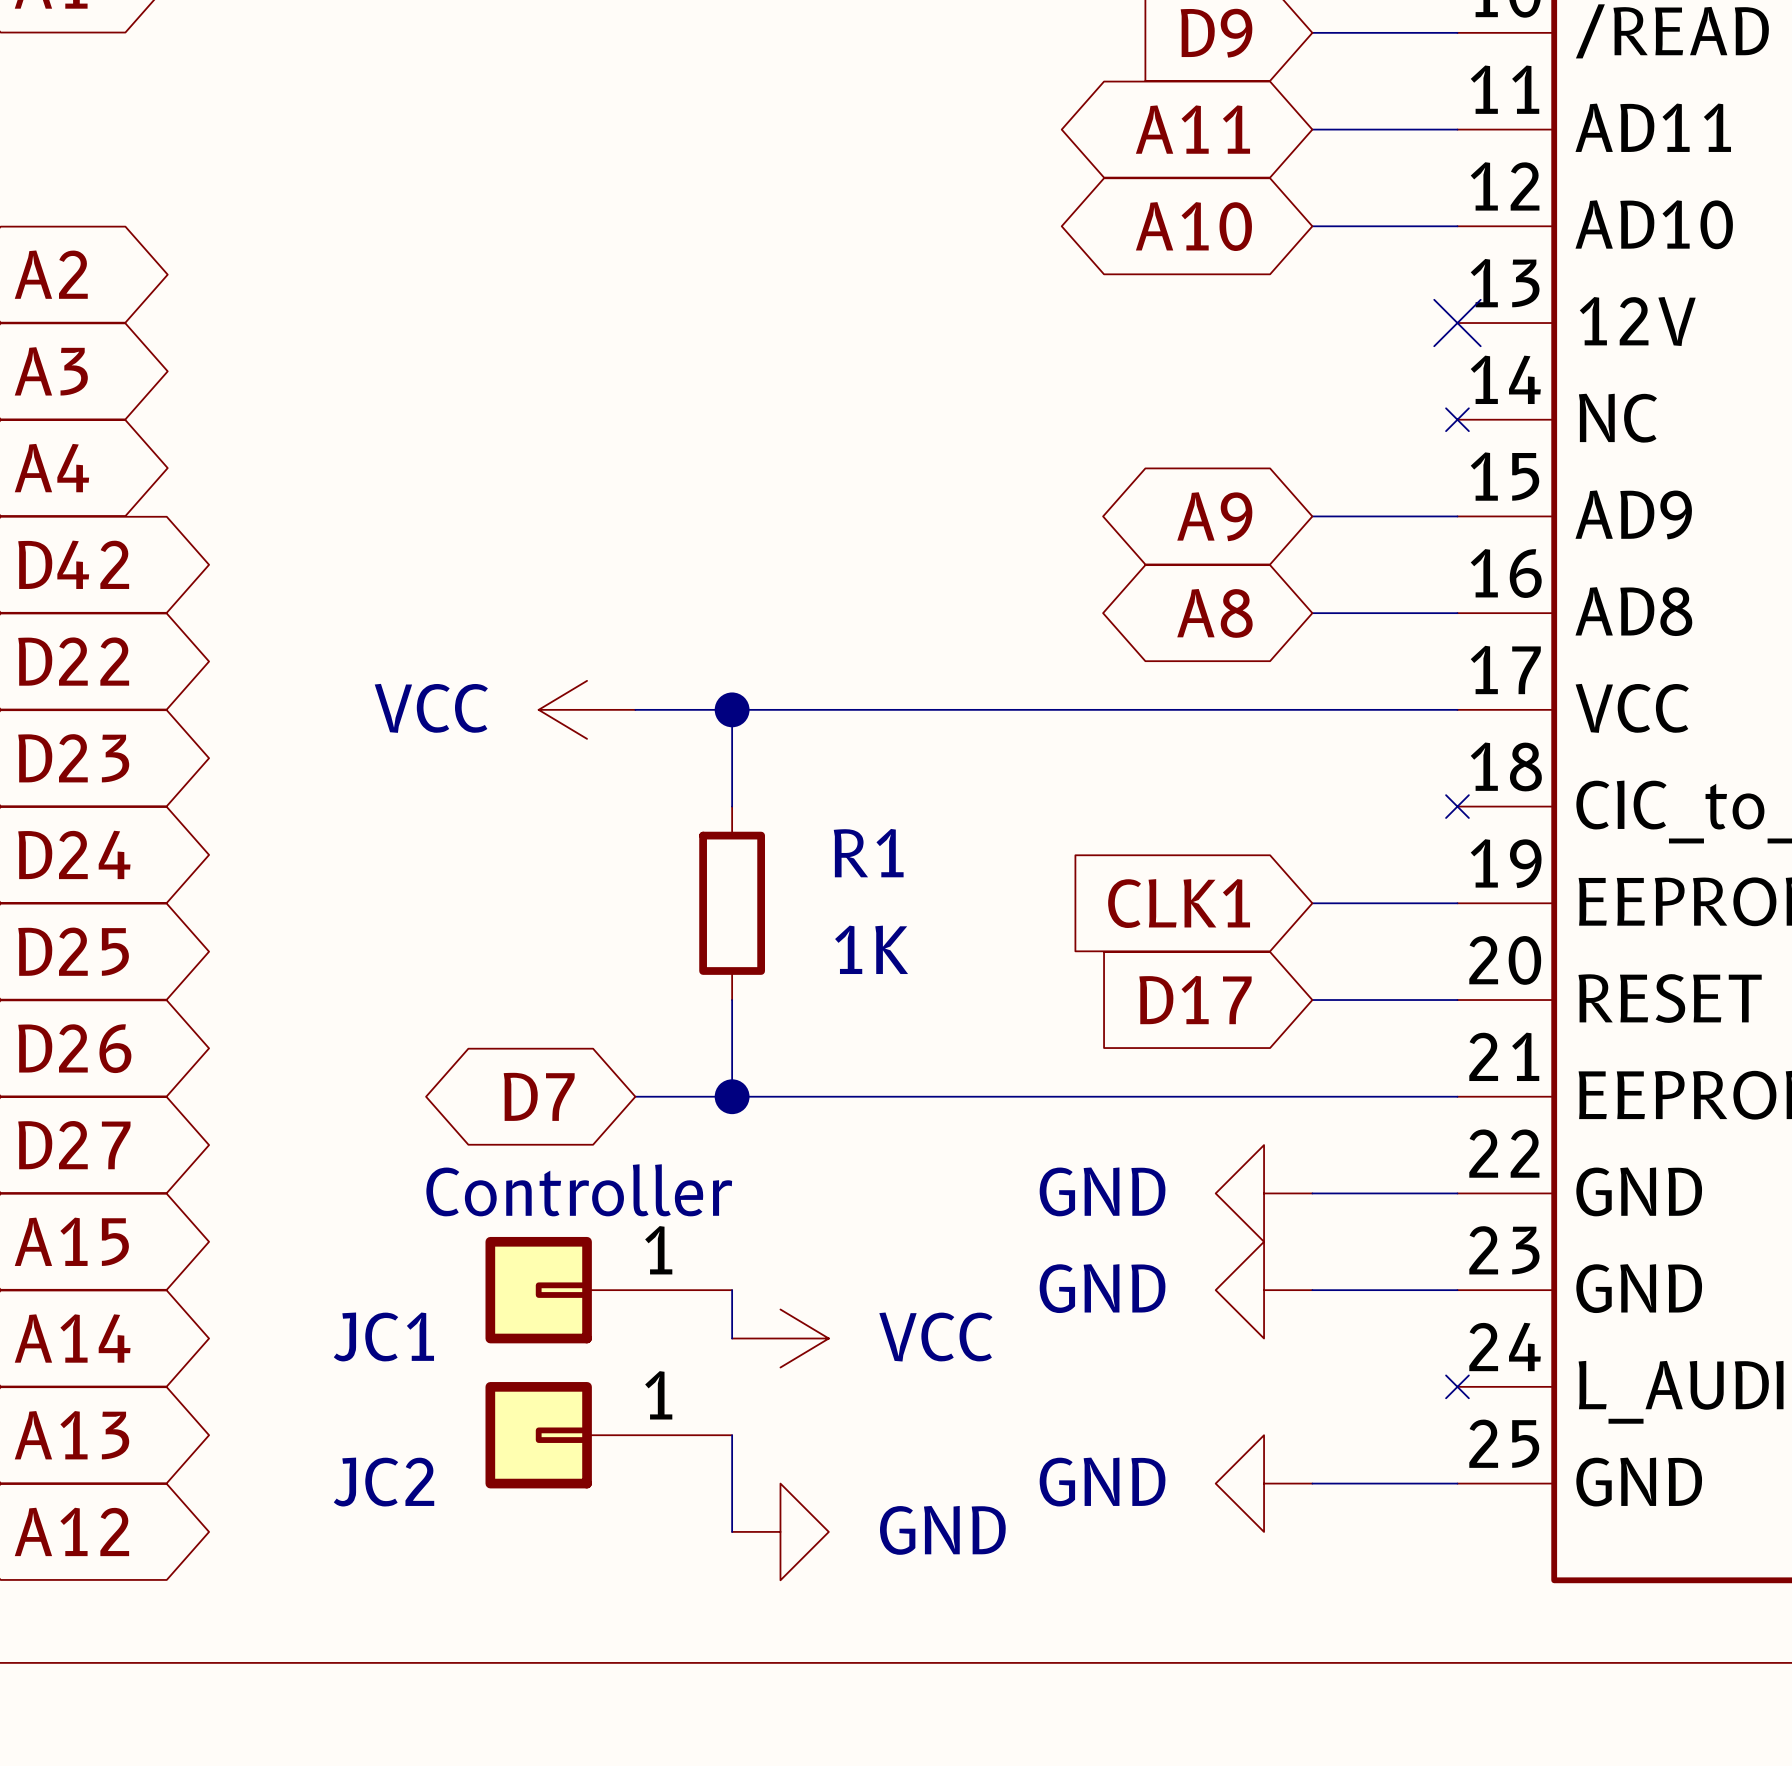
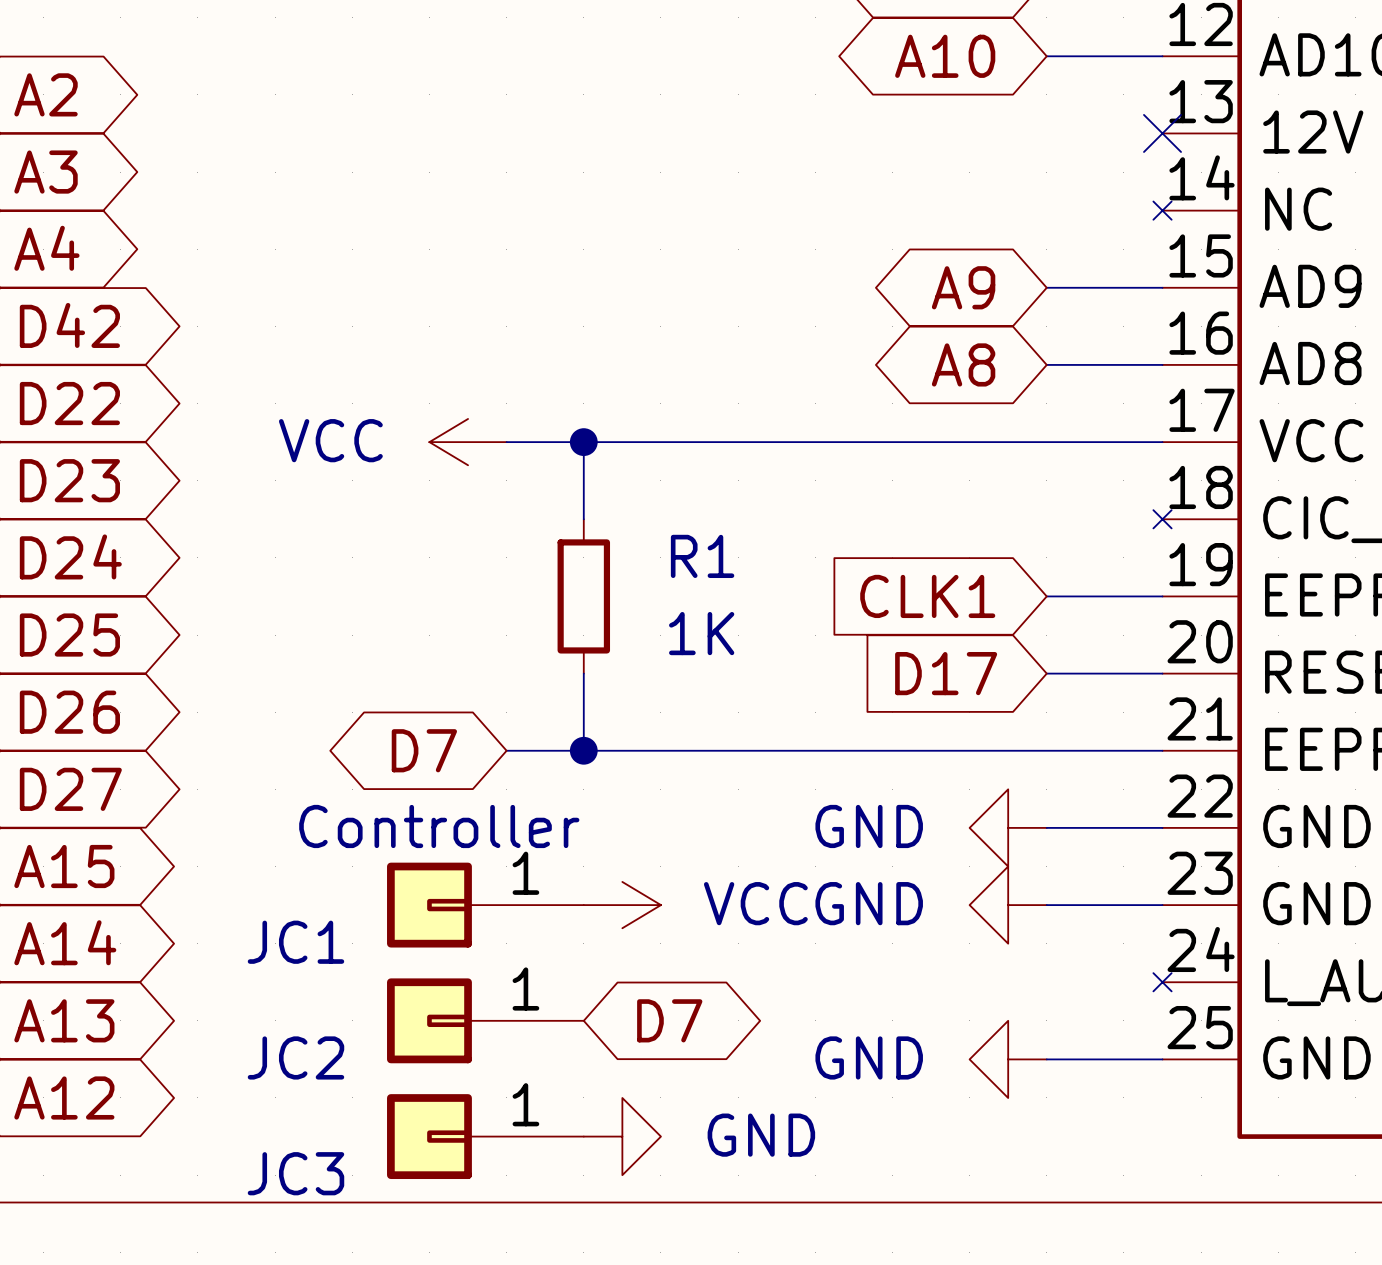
wire: (732, 1290) (732, 1338) -> none
power symbol position: VCC (780, 1338) -> VCC (622, 905)
wire: (732, 1435) (732, 1531) -> none
global label: none -> D7 (669, 1020)
power symbol position: GND (780, 1531) -> GND (622, 1136)
JC3: none -> (485, 1136)

